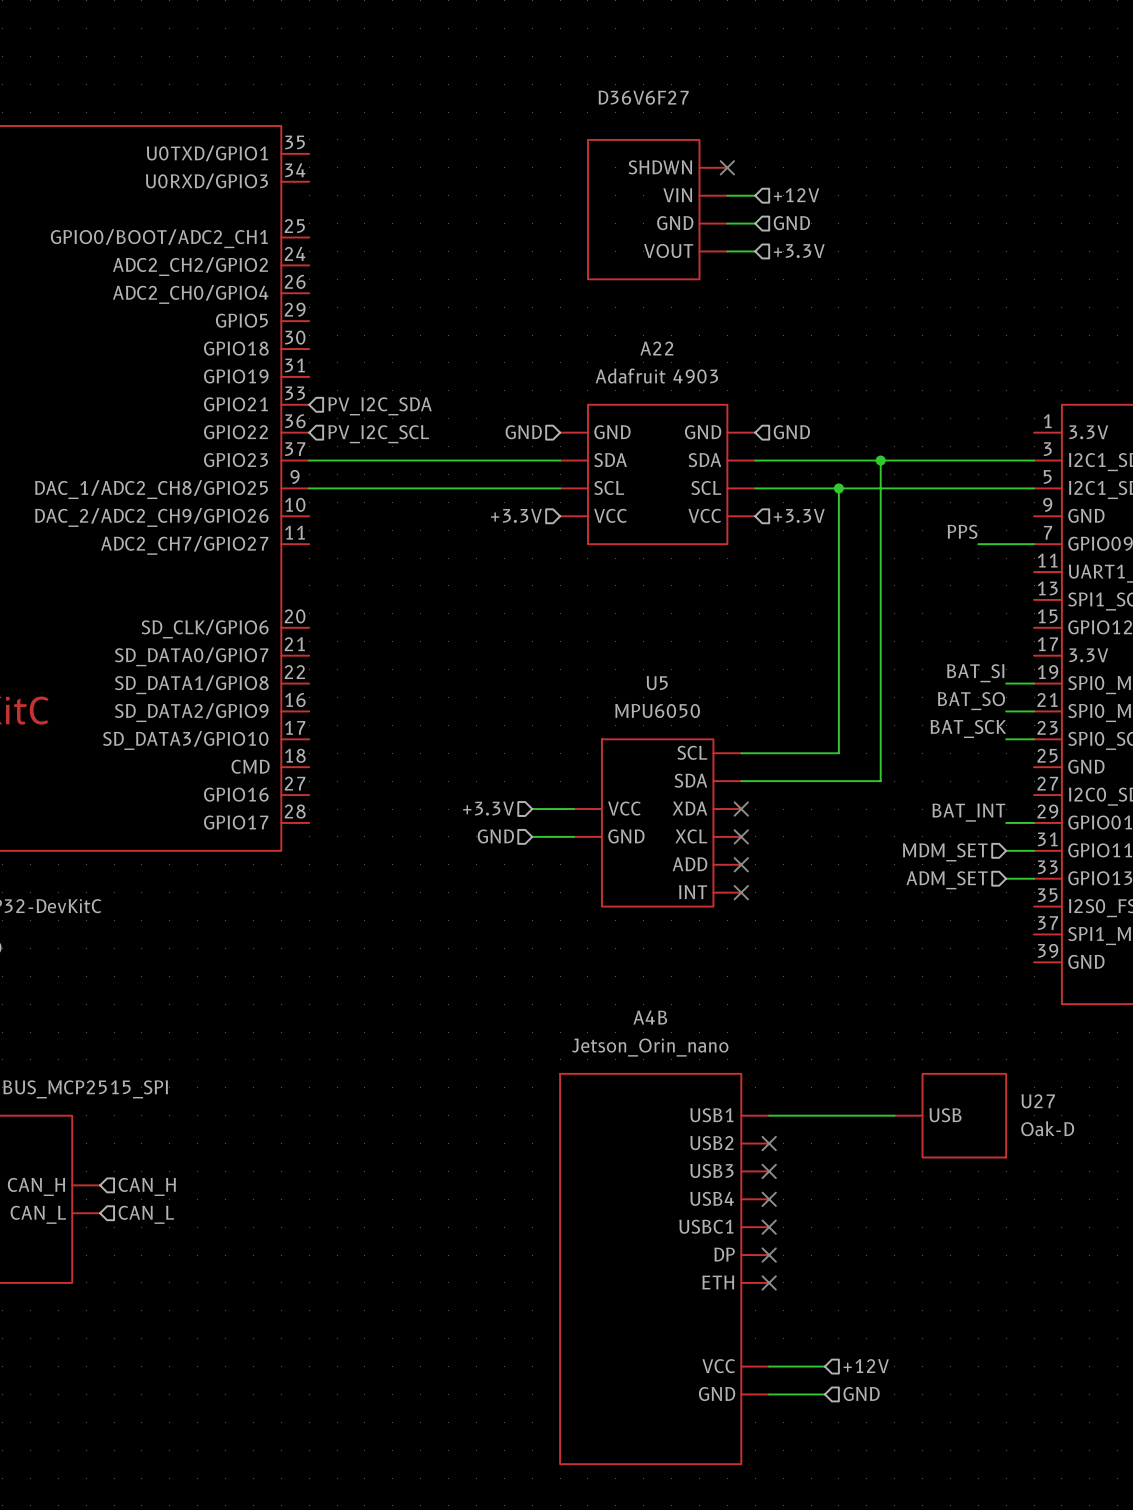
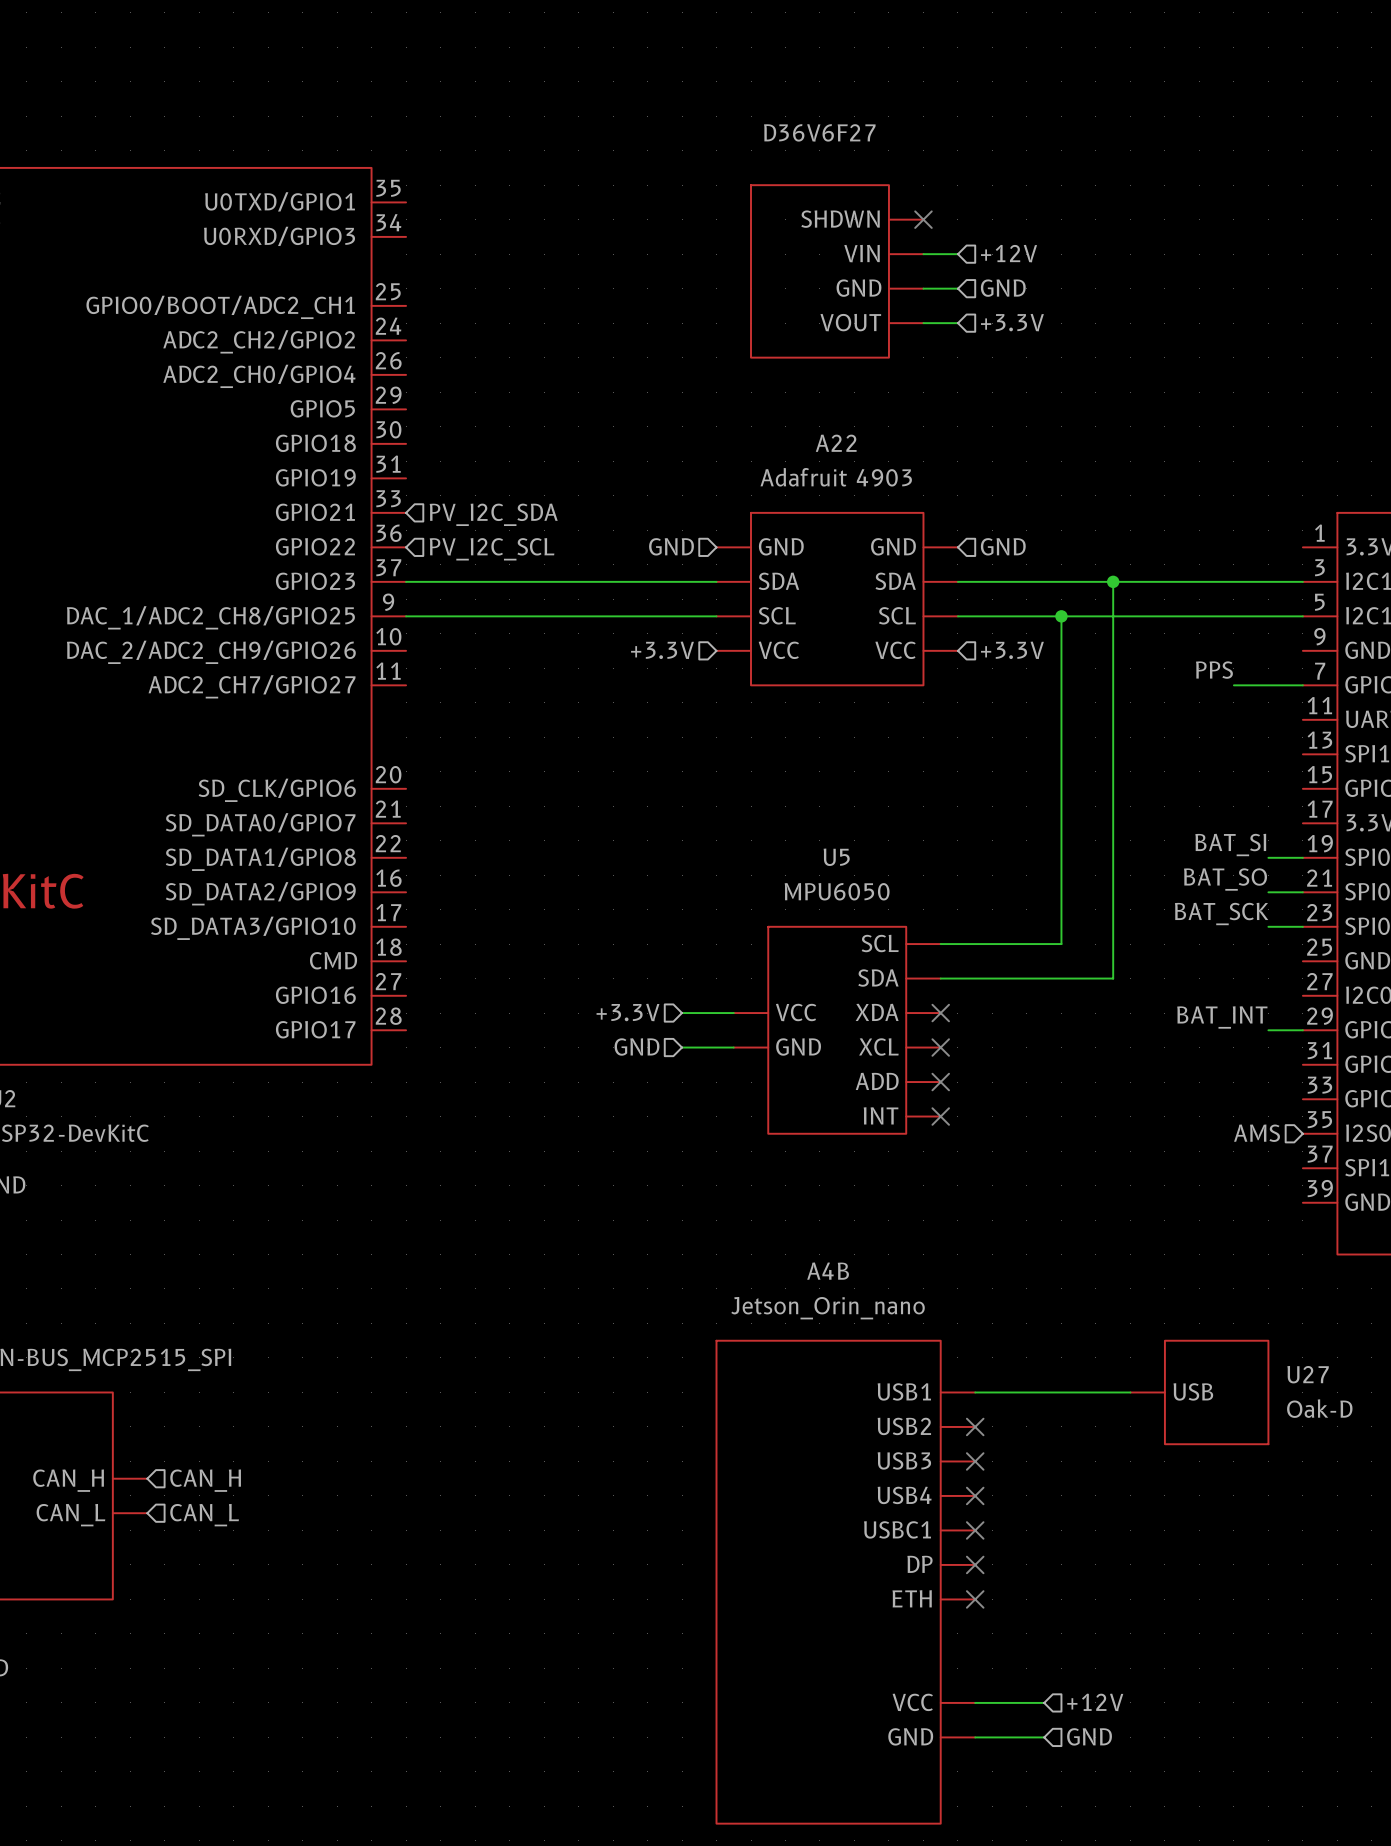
wire: (1006, 850) (1034, 850) -> none
hierarchical label: MDM_SET (945, 852) -> none
wire: (1006, 878) (1034, 878) -> none
hierarchical label: ADM_SET (947, 880) -> none
hierarchical label: none -> AMS (1257, 1133)

